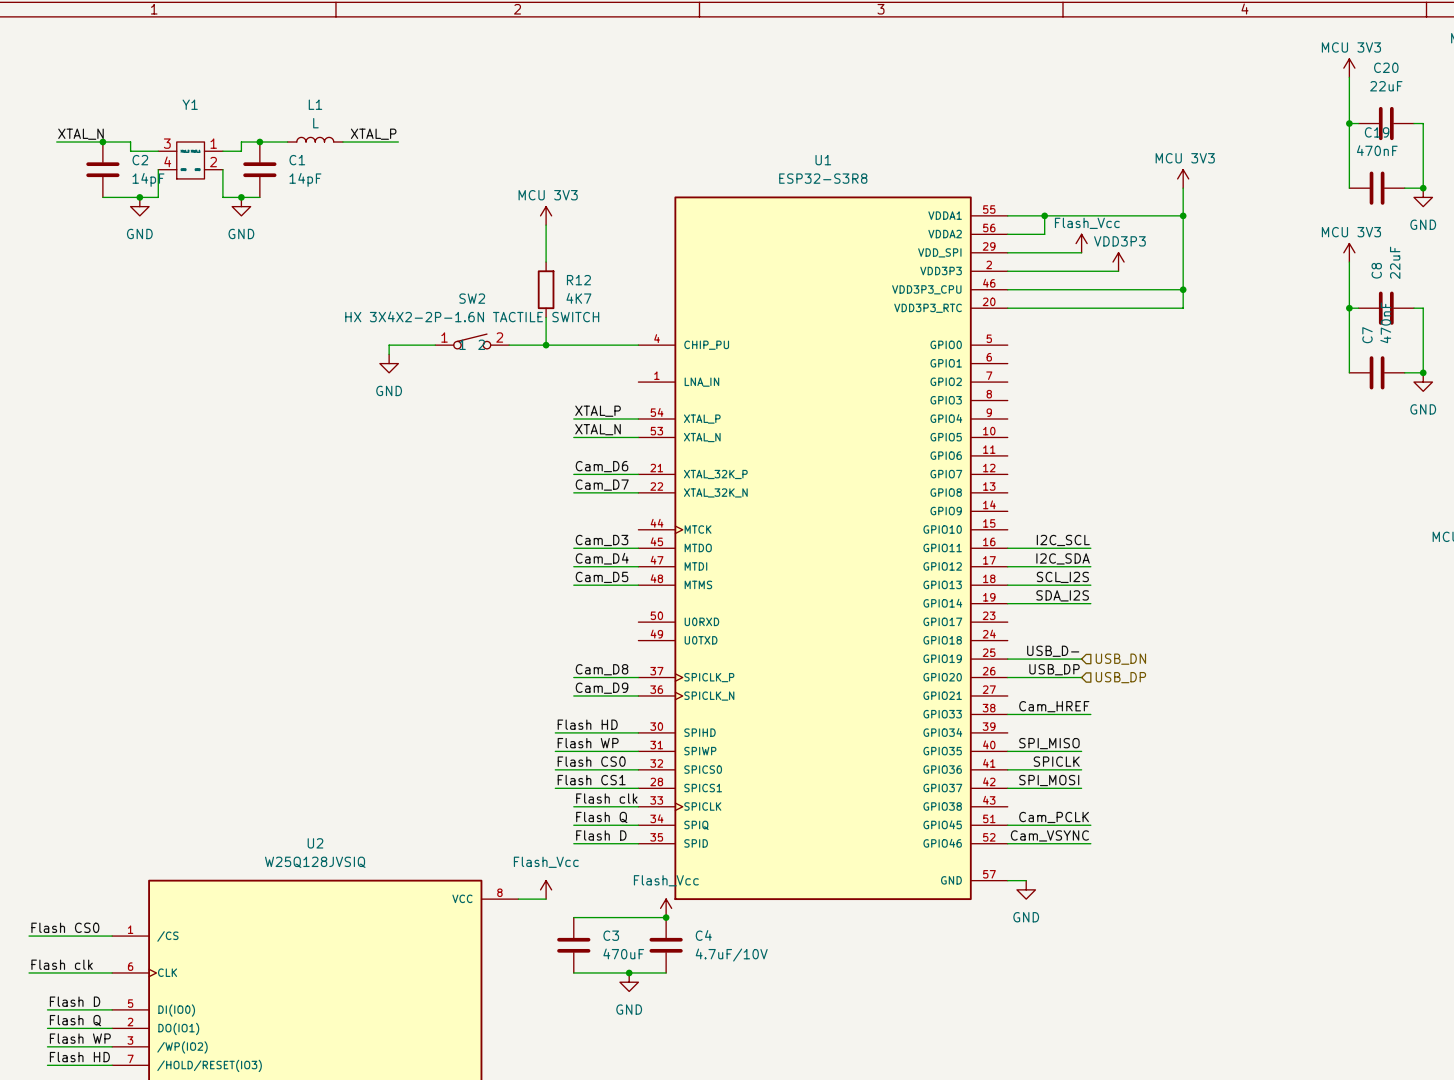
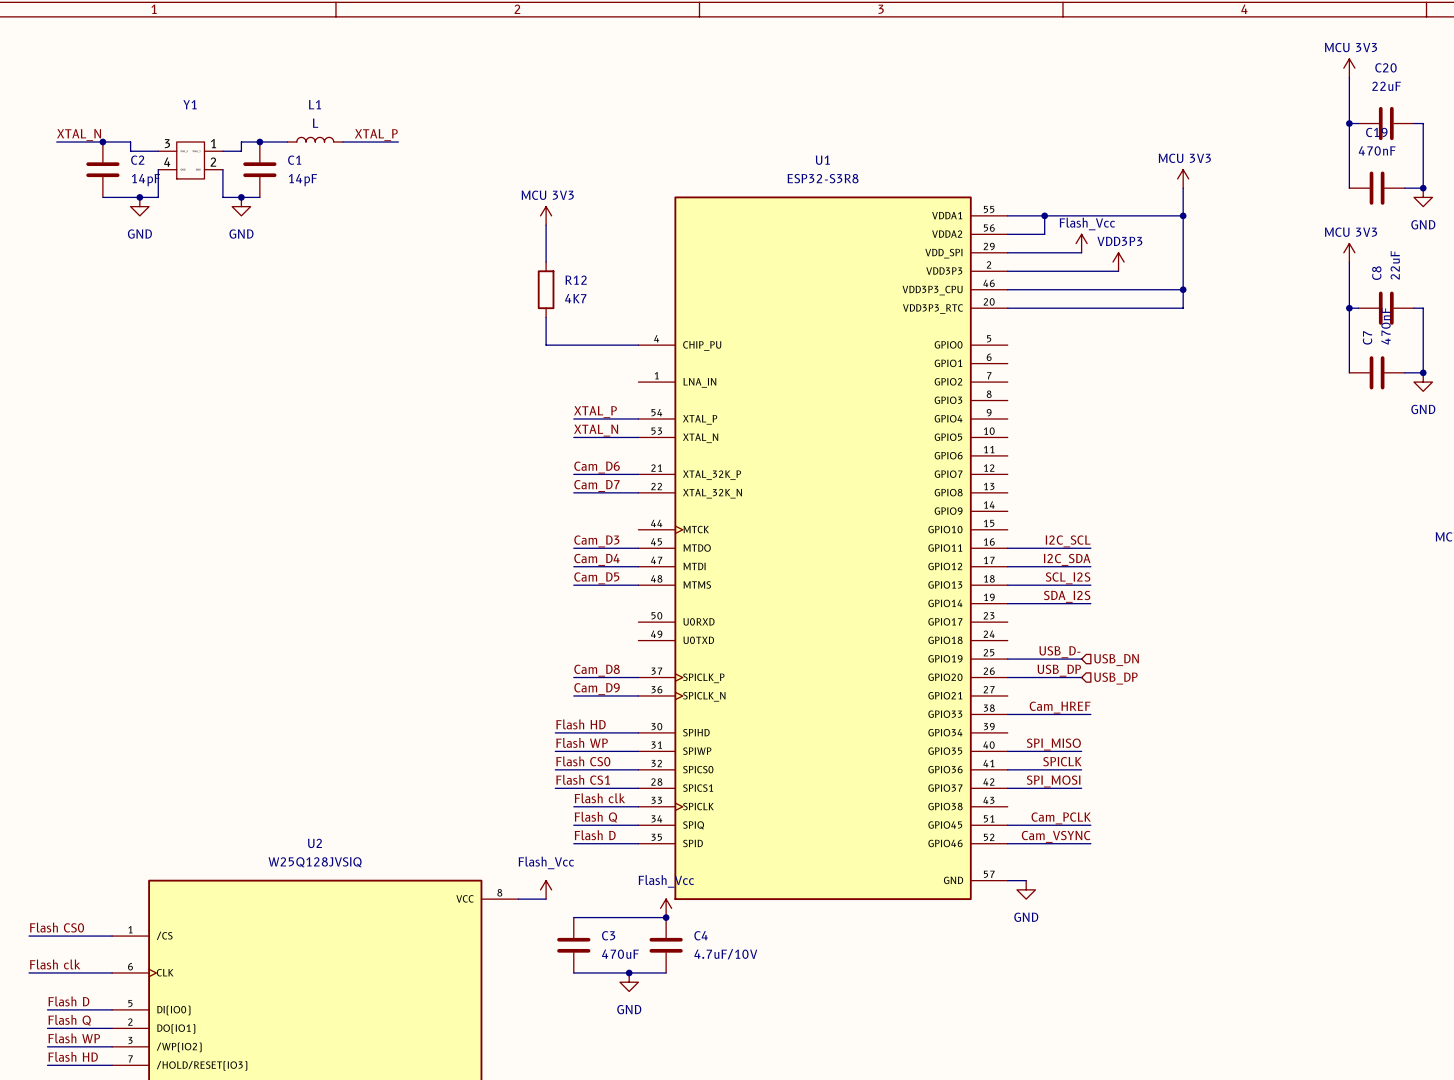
SW2: HX 3X4X2-2P-1.6N TACTILE SWITCH (472, 341) -> none
wire: (435, 345) (389, 345) (389, 354) -> none
wire: (509, 345) (546, 345) -> none
junction: (546, 345) -> none
power symbol: GND (389, 363) -> none

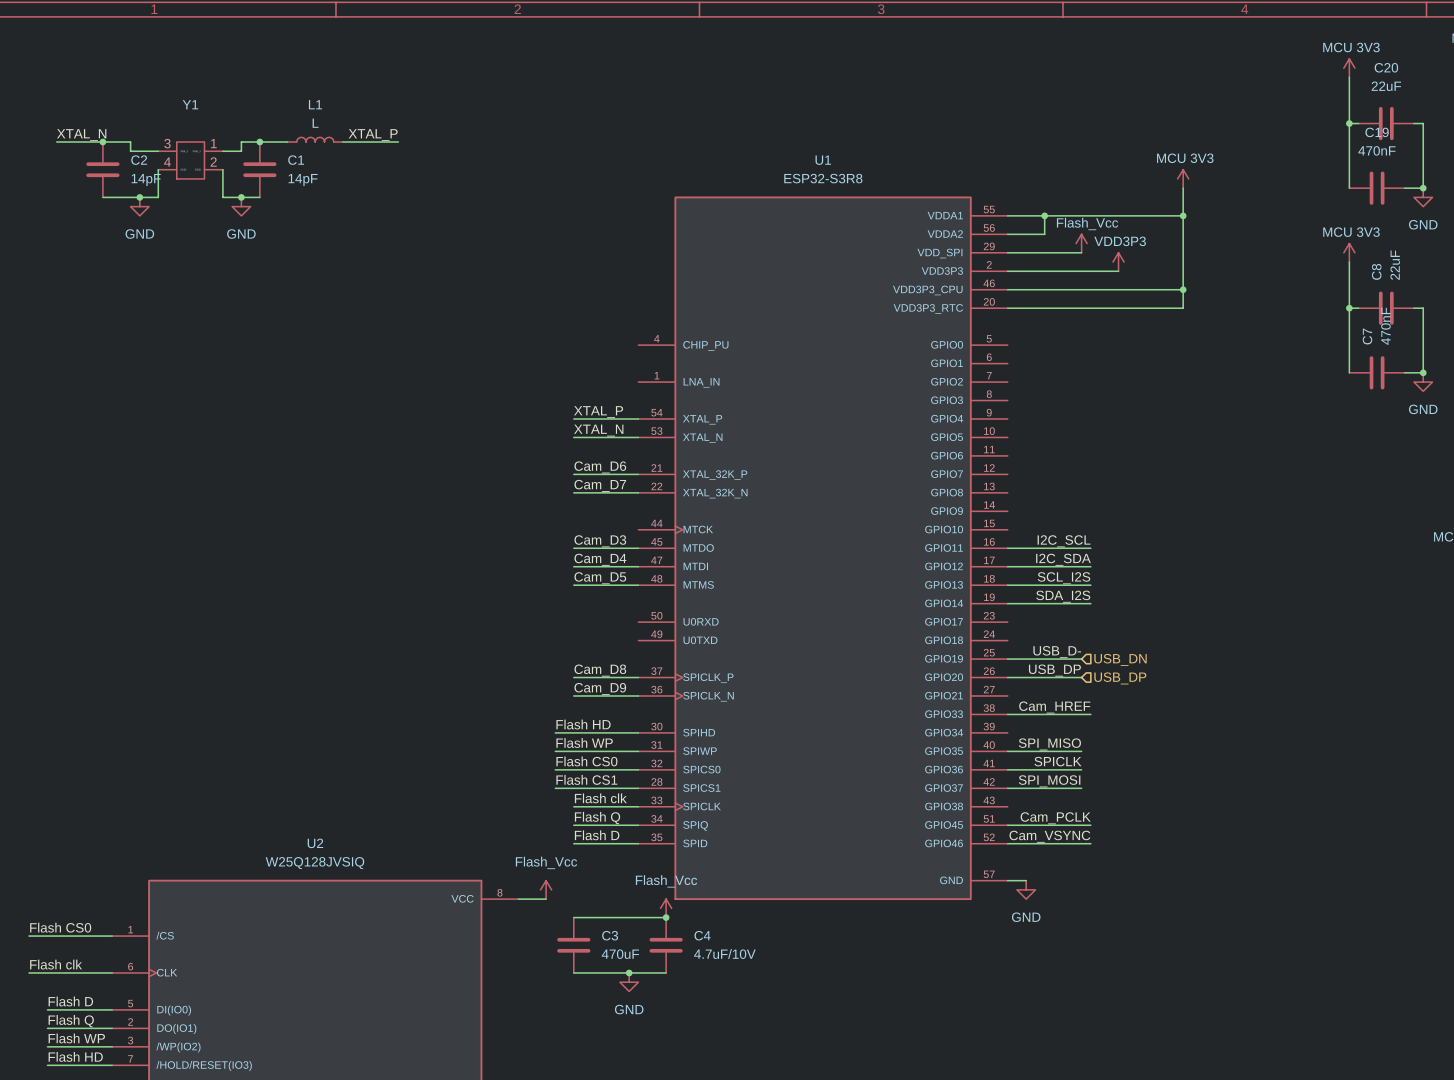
power symbol: MCU 3V3 (546, 215) -> none
wire: (546, 225) (546, 262) -> none
R12: 4K7 (546, 289) -> none
wire: (546, 317) (546, 345) (638, 345) -> none

